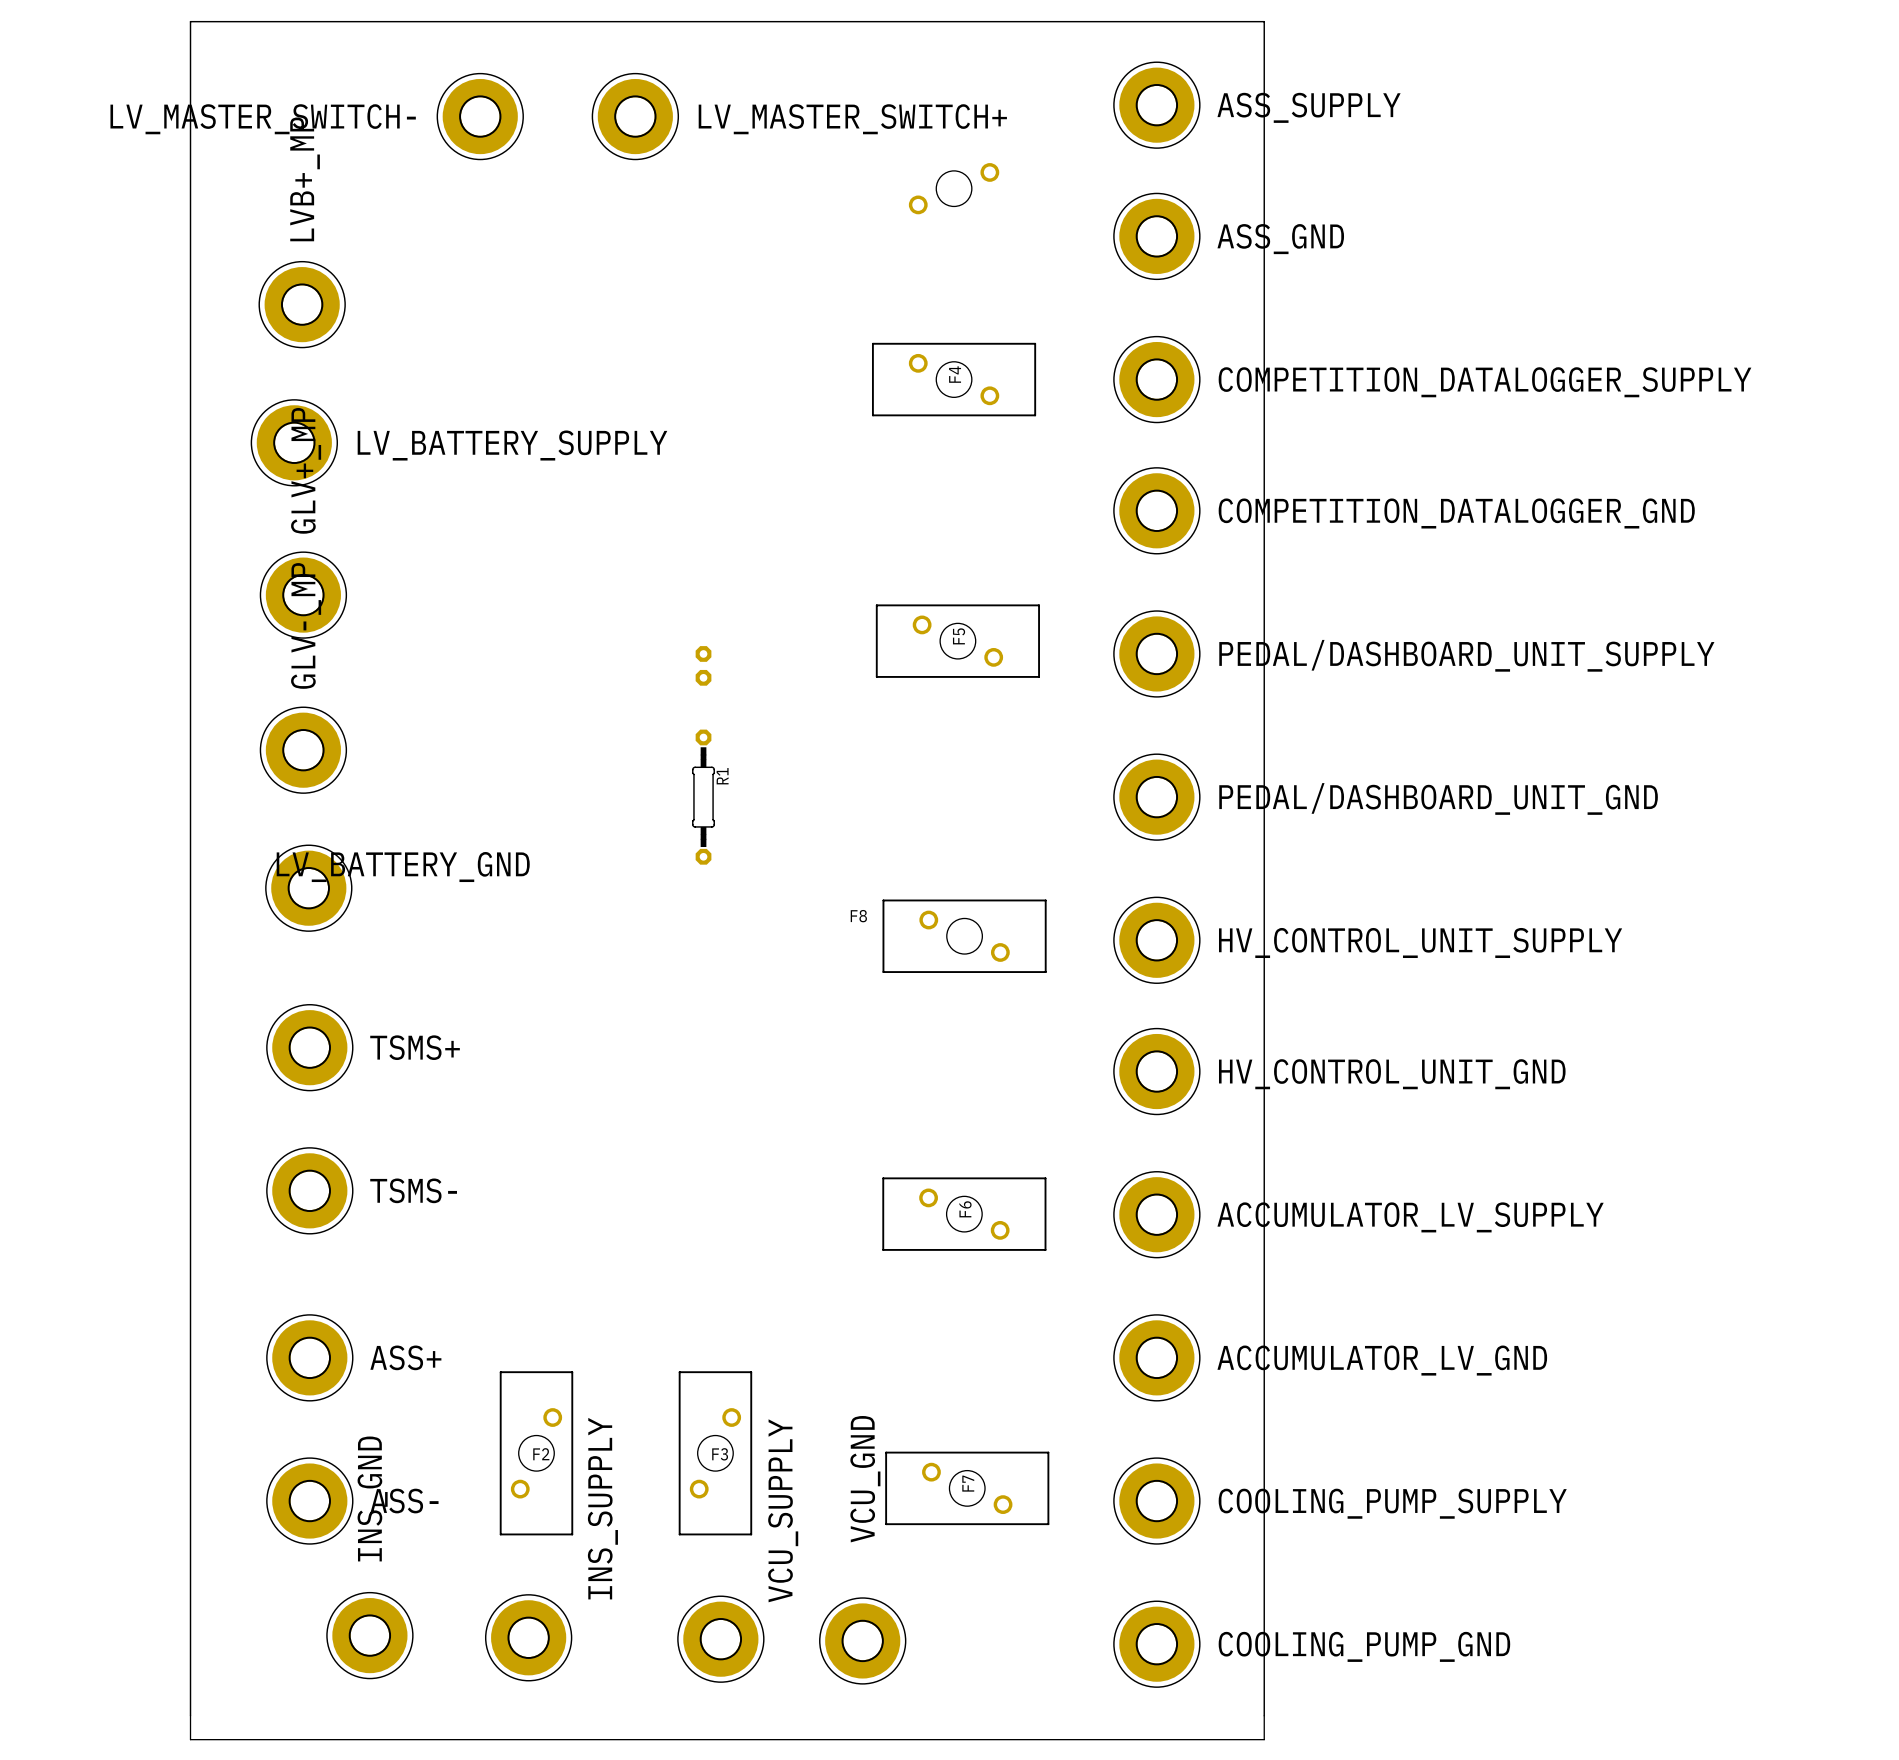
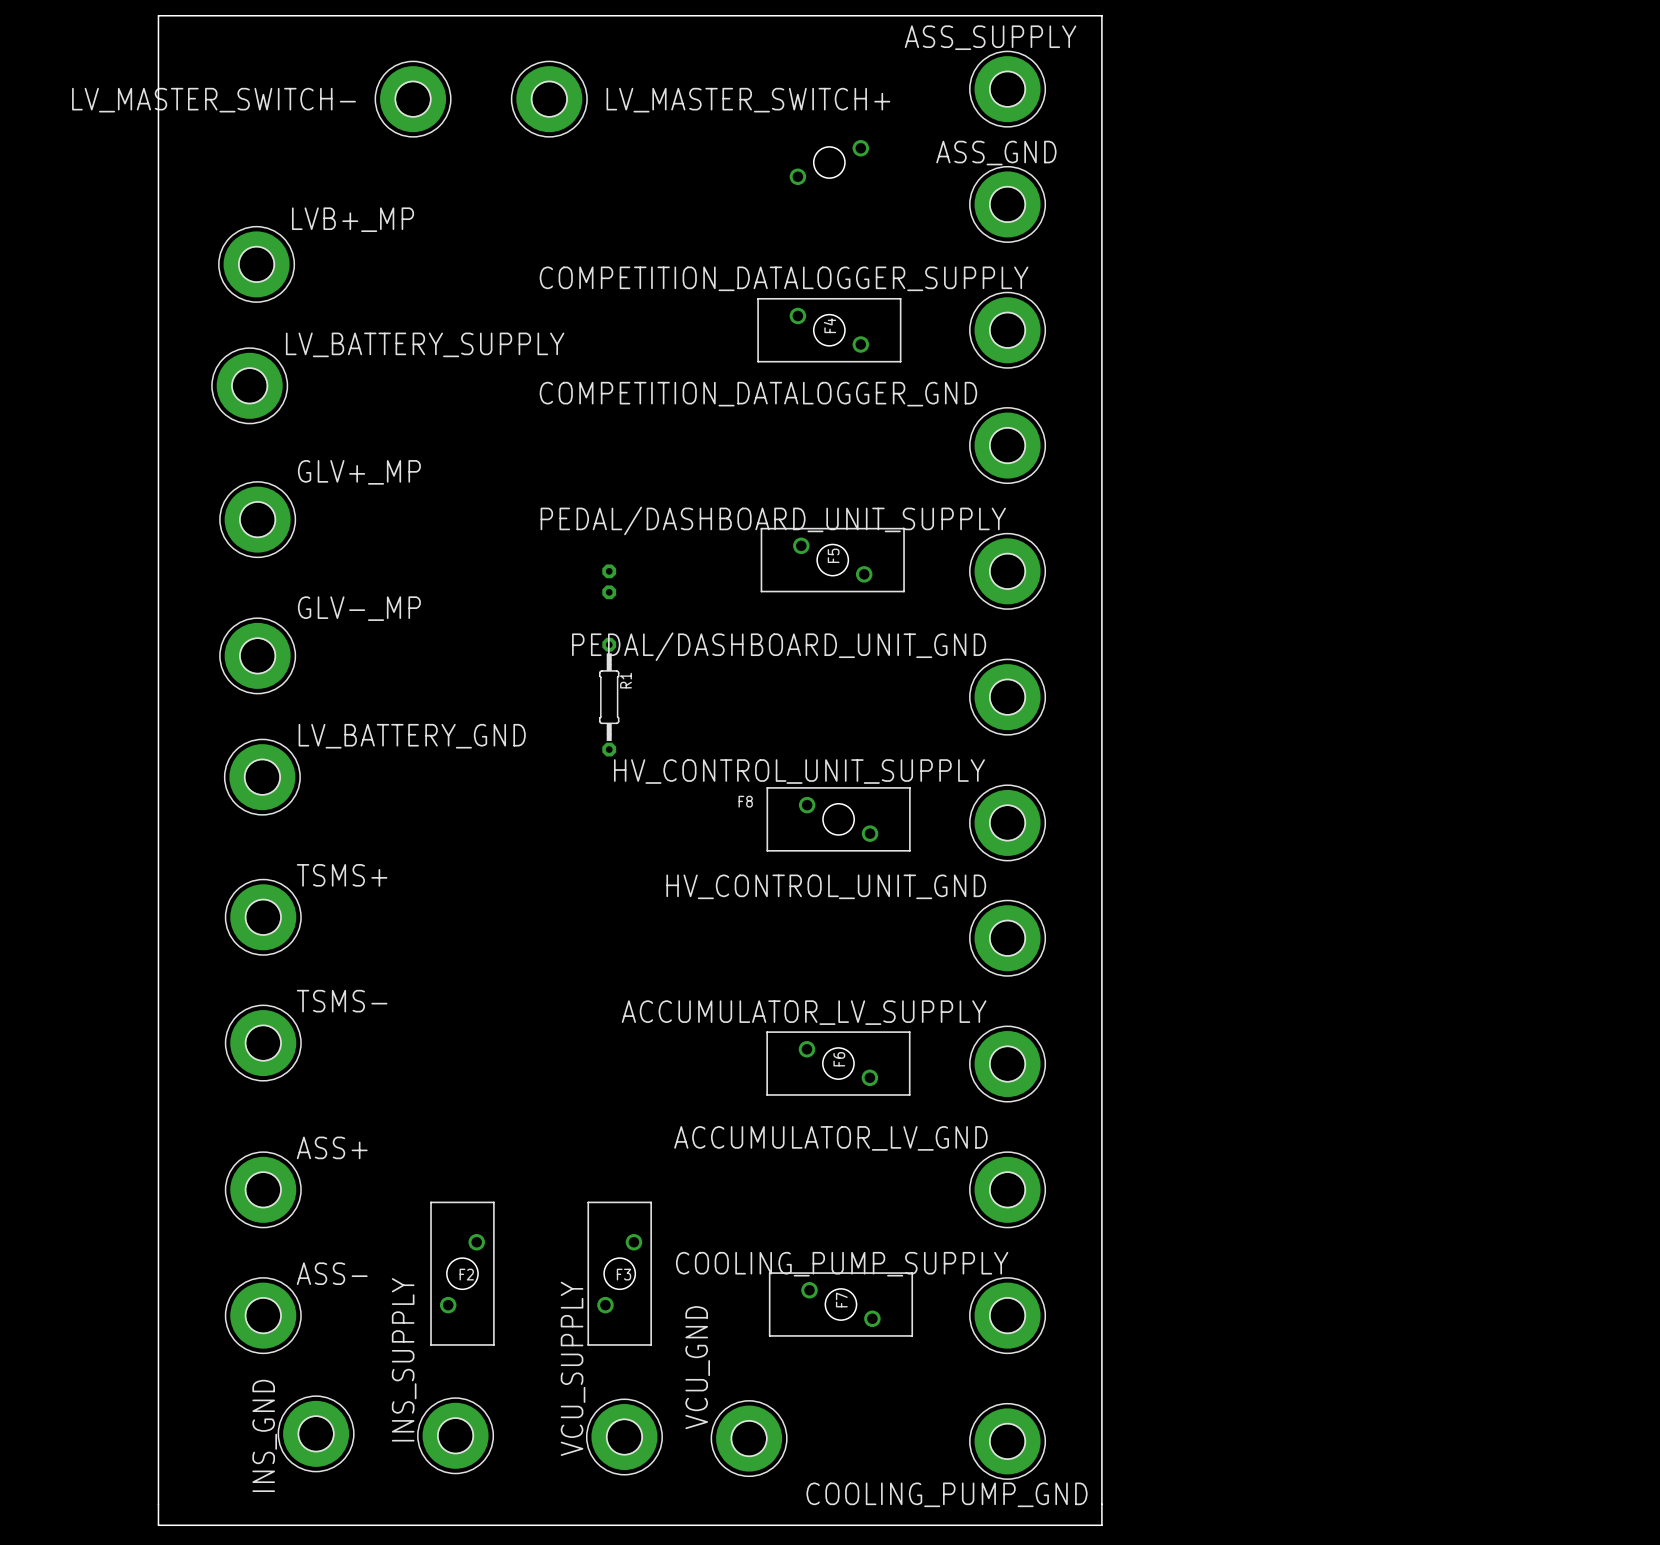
ASS_SUPPLY name position: ASS_SUPPLY (1309, 107) -> ASS_SUPPLY (990, 37)
LVB+_MP name rotation: 0° (305, 179) -> 90° clockwise (353, 219)
ASS_GND name position: ASS_GND (1280, 239) -> ASS_GND (996, 153)
COMPETITION_DATALOGGER_SUPPLY name position: COMPETITION_DATALOGGER_SUPPLY (1485, 382) -> COMPETITION_DATALOGGER_SUPPLY (784, 278)
LV_BATTERY_SUPPLY name position: LV_BATTERY_SUPPLY (512, 445) -> LV_BATTERY_SUPPLY (425, 344)
GLV+_MP name rotation: 0° (306, 470) -> 90° clockwise (359, 472)
COMPETITION_DATALOGGER_GND name position: COMPETITION_DATALOGGER_GND (1456, 513) -> COMPETITION_DATALOGGER_GND (758, 394)
GLV-_MP name rotation: 0° (306, 625) -> 90° clockwise (359, 608)
PEDAL/DASHBOARD_UNIT_SUPPLY name position: PEDAL/DASHBOARD_UNIT_SUPPLY (1466, 655) -> PEDAL/DASHBOARD_UNIT_SUPPLY (773, 520)
PEDAL/DASHBOARD_UNIT_GND name position: PEDAL/DASHBOARD_UNIT_GND (1438, 798) -> PEDAL/DASHBOARD_UNIT_GND (779, 646)
LV_BATTERY_GND name position: LV_BATTERY_GND (403, 867) -> LV_BATTERY_GND (412, 736)
HV_CONTROL_UNIT_SUPPLY name position: HV_CONTROL_UNIT_SUPPLY (1420, 942) -> HV_CONTROL_UNIT_SUPPLY (799, 771)
TSMS+ name position: TSMS+ (415, 1047) -> TSMS+ (342, 875)
HV_CONTROL_UNIT_GND name position: HV_CONTROL_UNIT_GND (1392, 1074) -> HV_CONTROL_UNIT_GND (826, 886)
TSMS- name position: TSMS- (413, 1190) -> TSMS- (342, 1001)
ACCUMULATOR_LV_SUPPLY name position: ACCUMULATOR_LV_SUPPLY (1410, 1217) -> ACCUMULATOR_LV_SUPPLY (804, 1012)
ASS+ name position: ASS+ (405, 1357) -> ASS+ (332, 1147)
ACCUMULATOR_LV_GND name position: ACCUMULATOR_LV_GND (1382, 1360) -> ACCUMULATOR_LV_GND (830, 1138)
VCU_GND name position: VCU_GND (865, 1479) -> VCU_GND (697, 1367)
INS_GND name position: INS_GND (372, 1498) -> INS_GND (264, 1435)
ASS- name position: ASS- (404, 1501) -> ASS- (332, 1273)
COOLING_PUMP_SUPPLY name position: COOLING_PUMP_SUPPLY (1392, 1503) -> COOLING_PUMP_SUPPLY (842, 1264)
INS_SUPPLY name position: INS_SUPPLY (602, 1508) -> INS_SUPPLY (404, 1359)
VCU_SUPPLY name position: VCU_SUPPLY (783, 1510) -> VCU_SUPPLY (573, 1368)
COOLING_PUMP_GND name position: COOLING_PUMP_GND (1364, 1646) -> COOLING_PUMP_GND (947, 1494)

